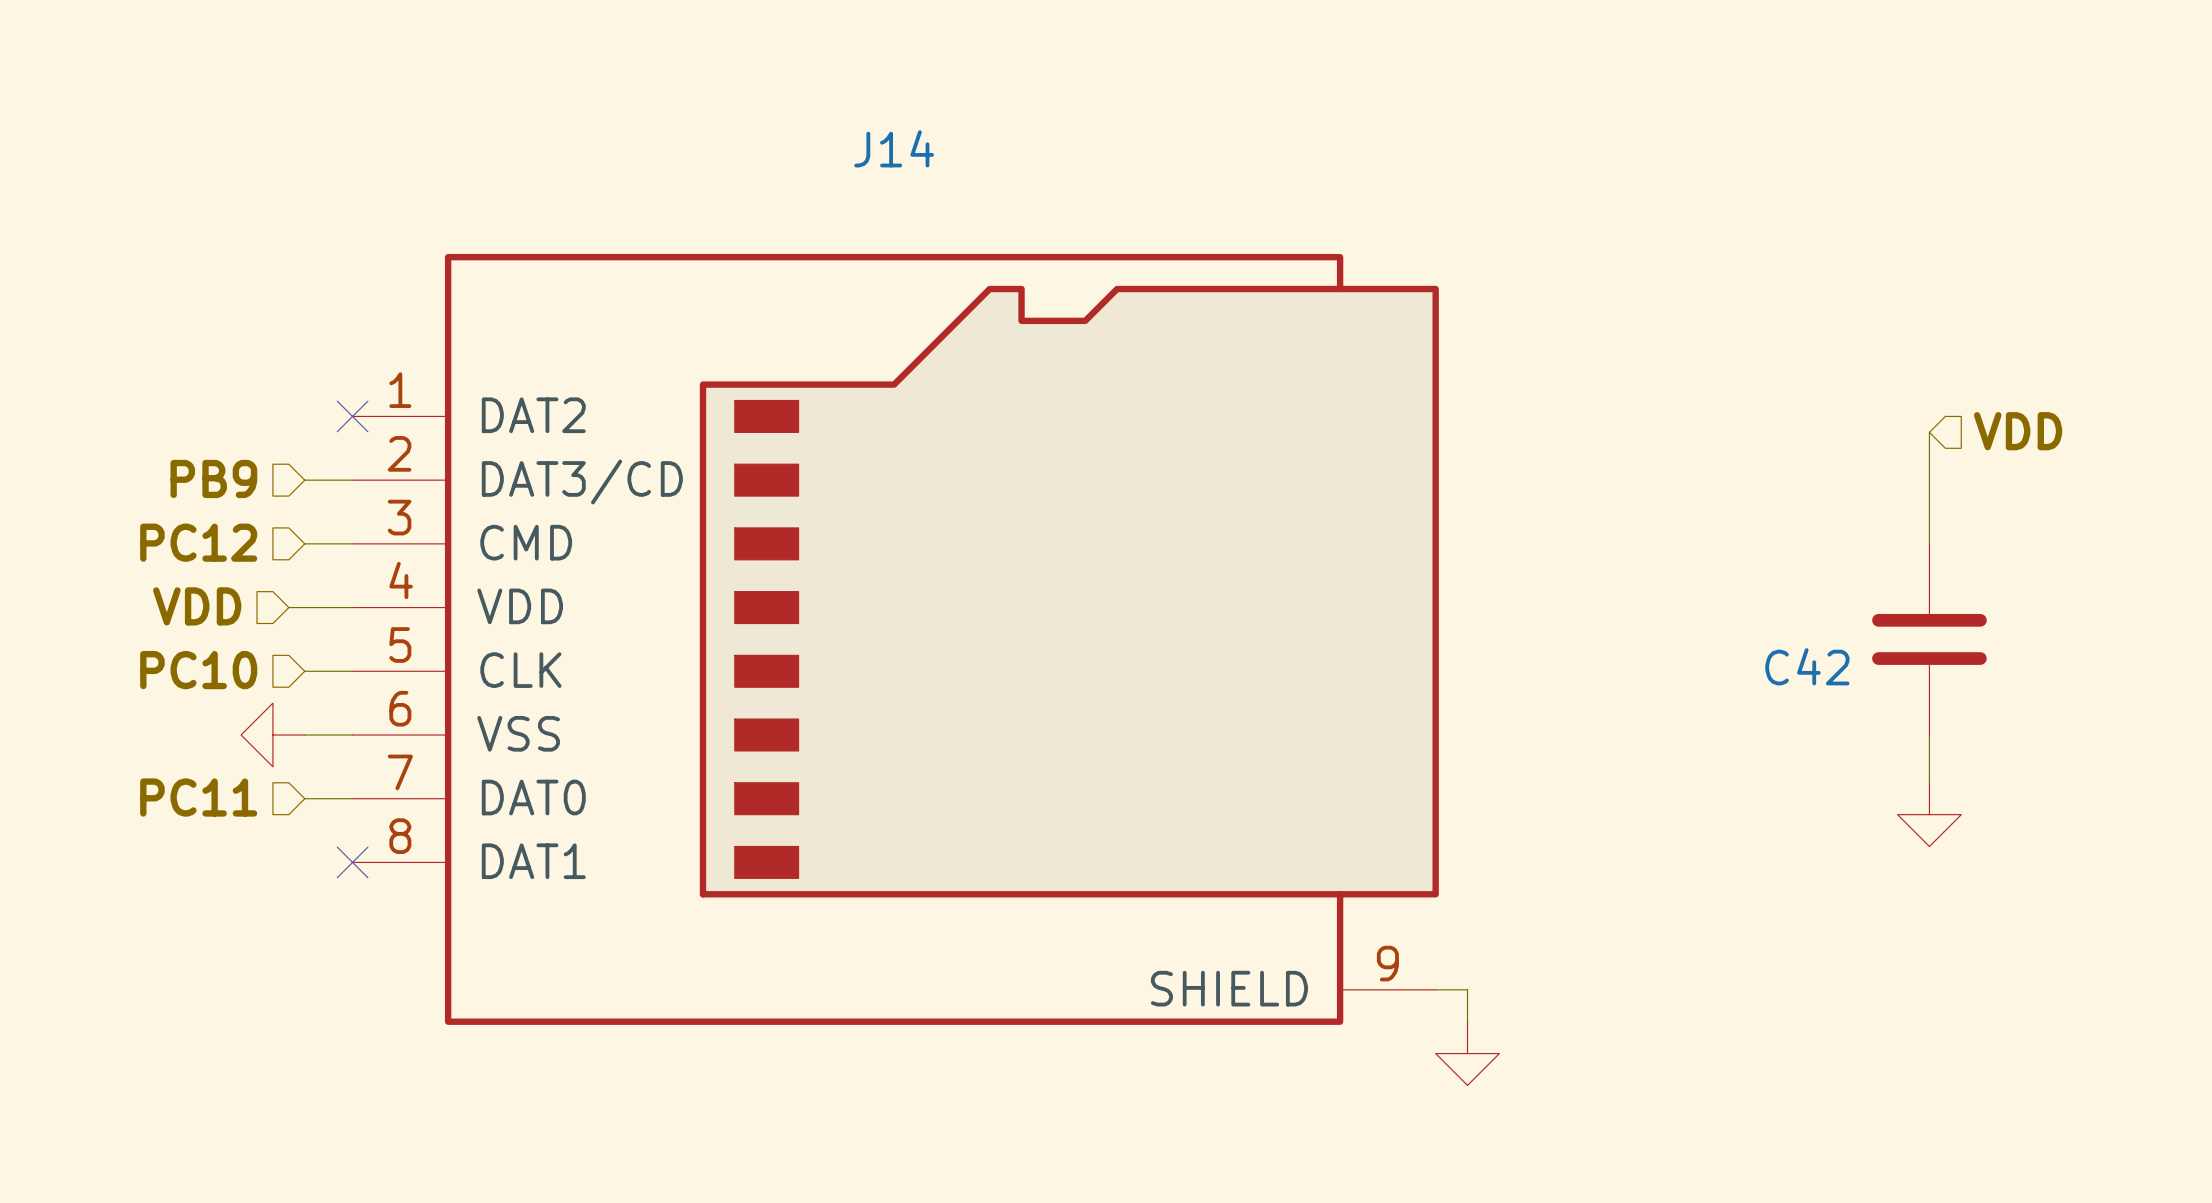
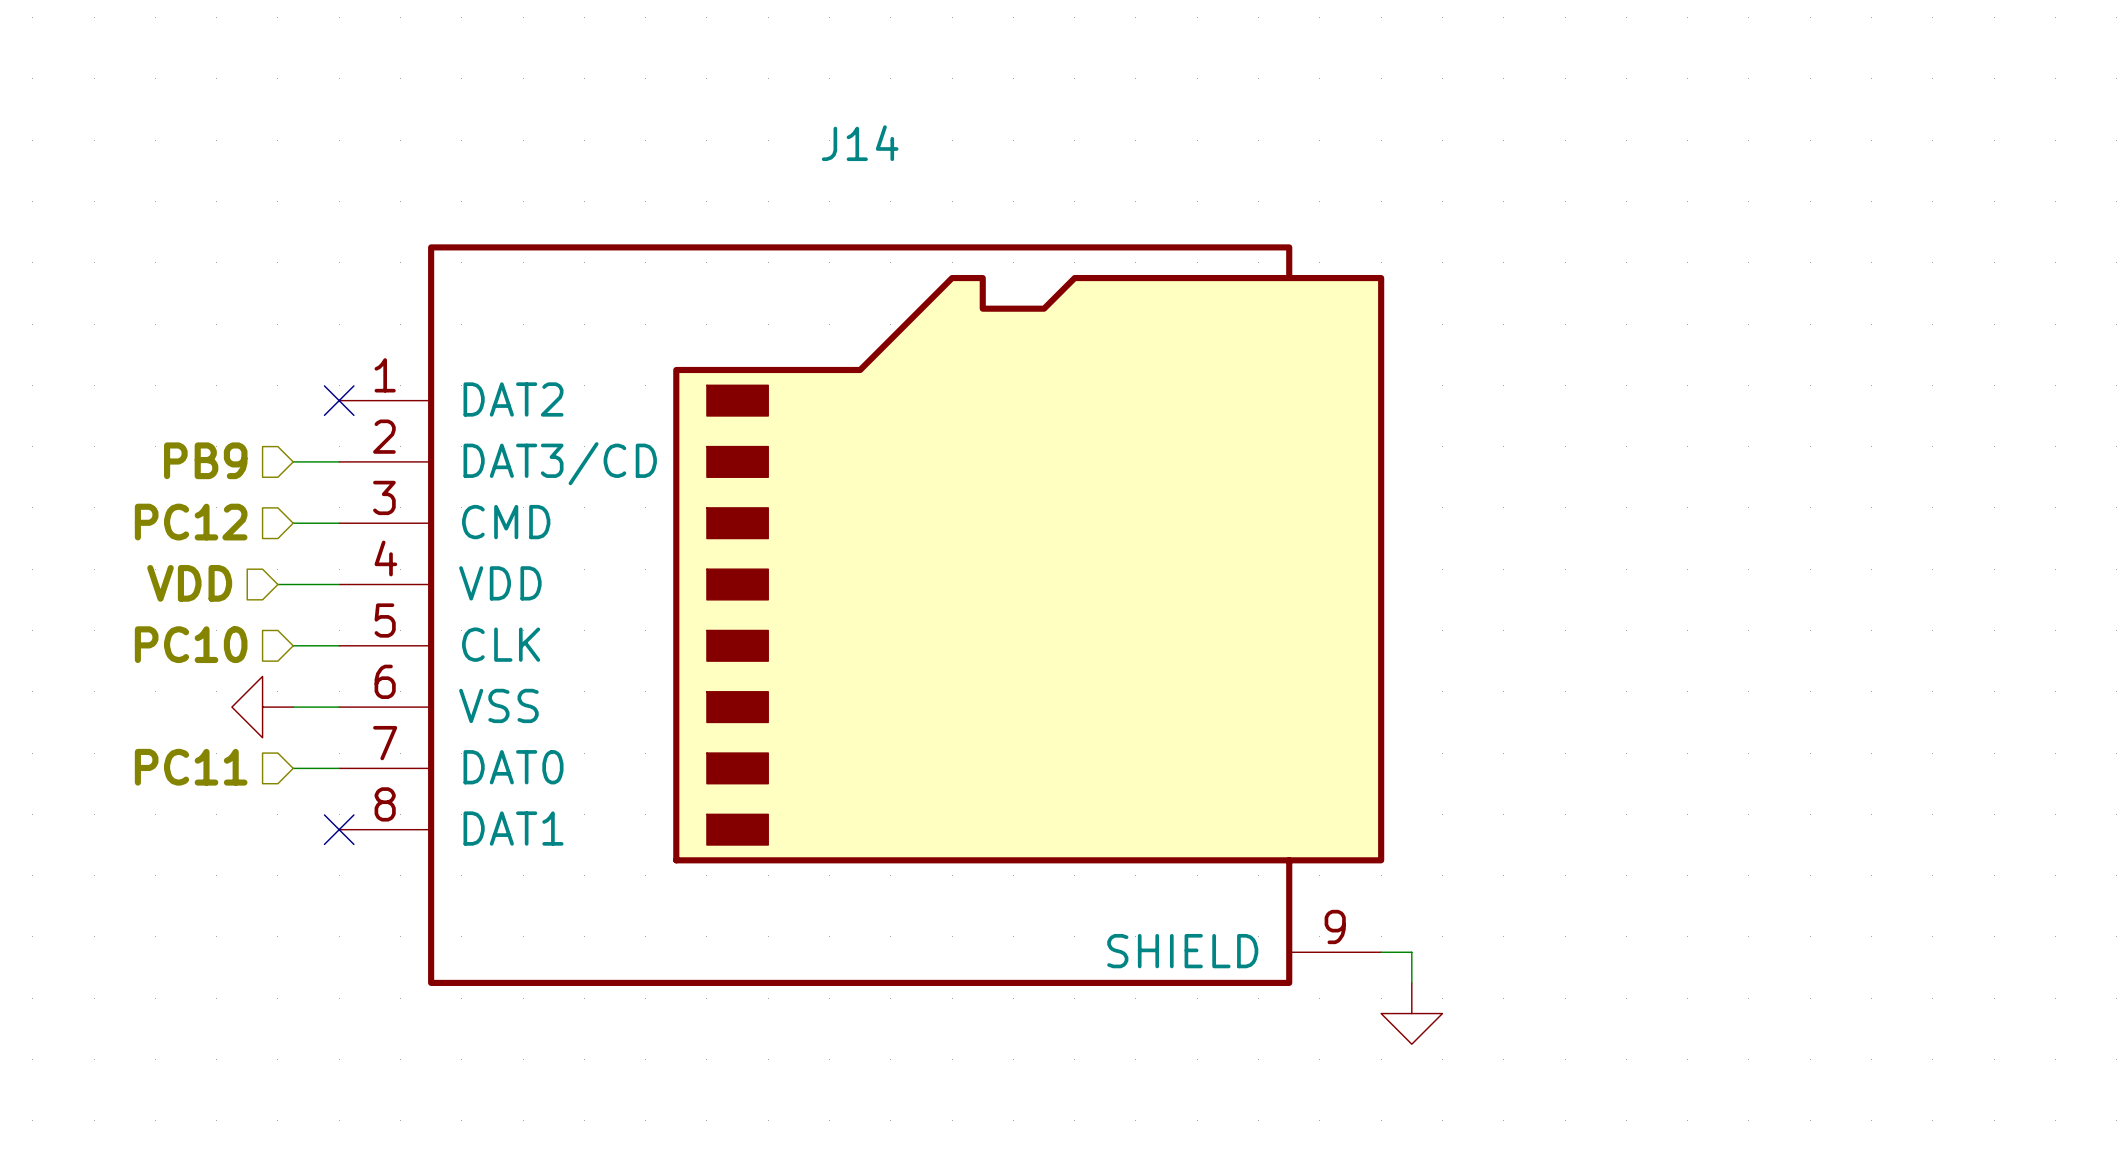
hierarchical label: VDD (2018, 431) -> none
wire: (1929, 432) (1929, 543) -> none
C42: (1929, 639) -> none
wire: (1929, 735) (1929, 782) -> none
power symbol: (1929, 814) -> none

